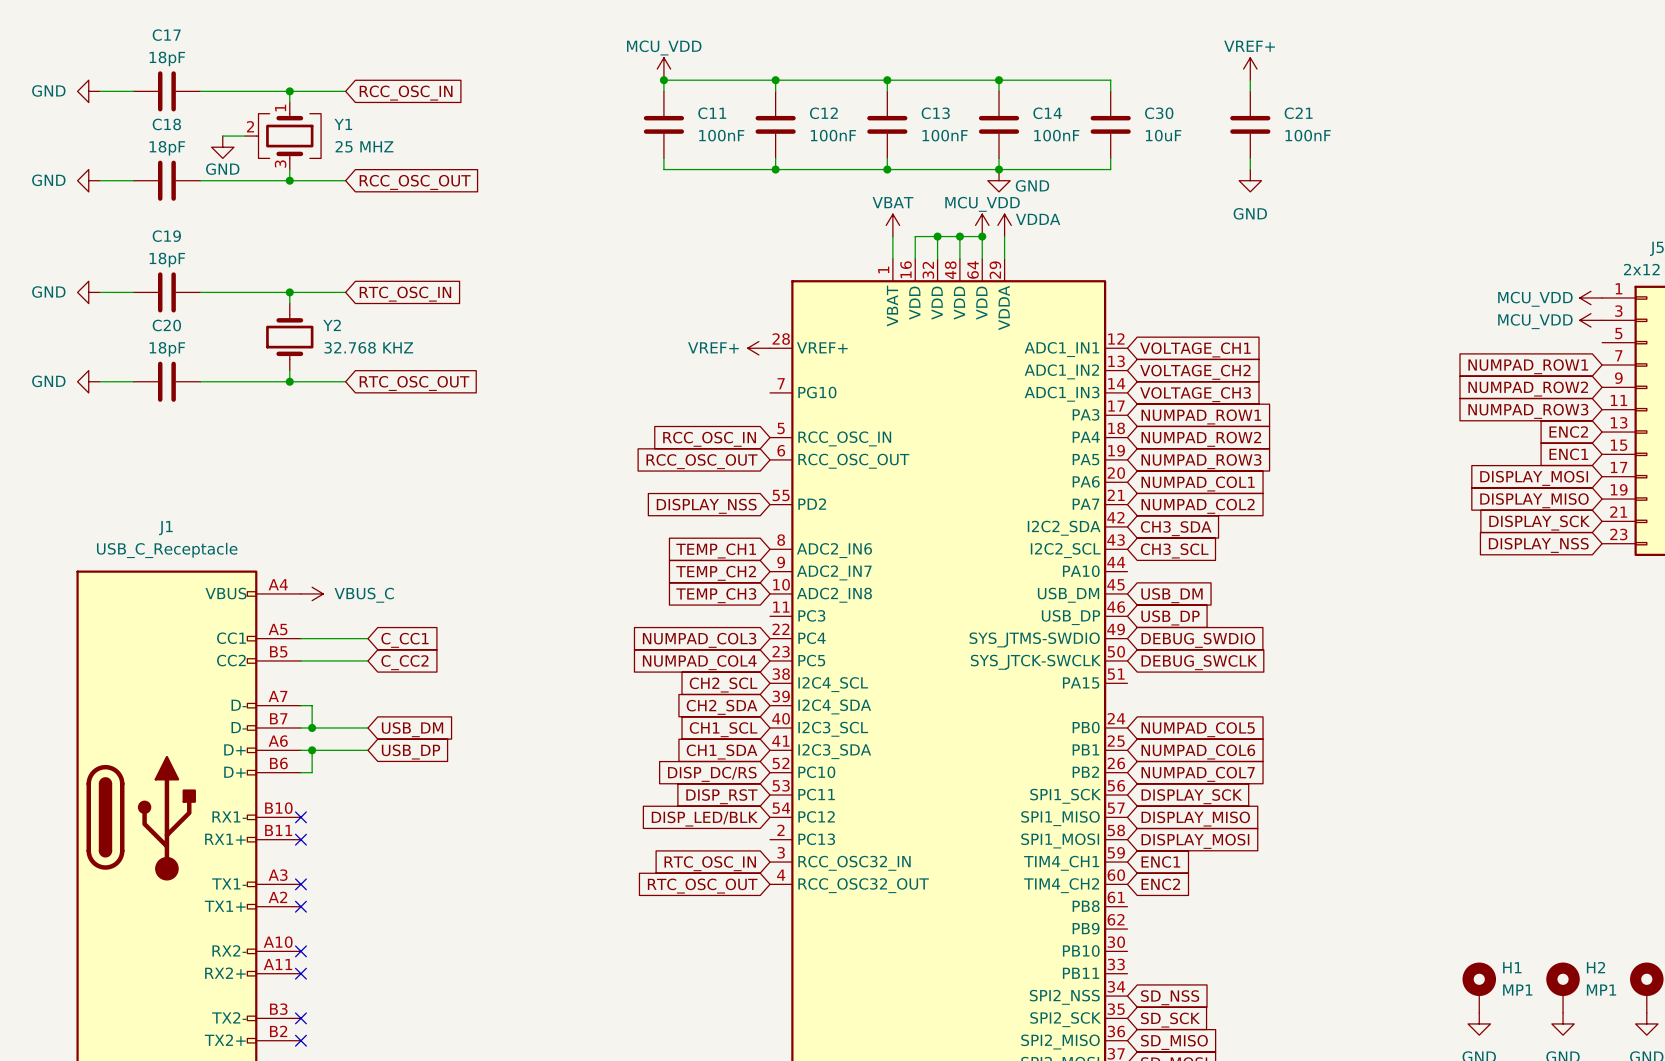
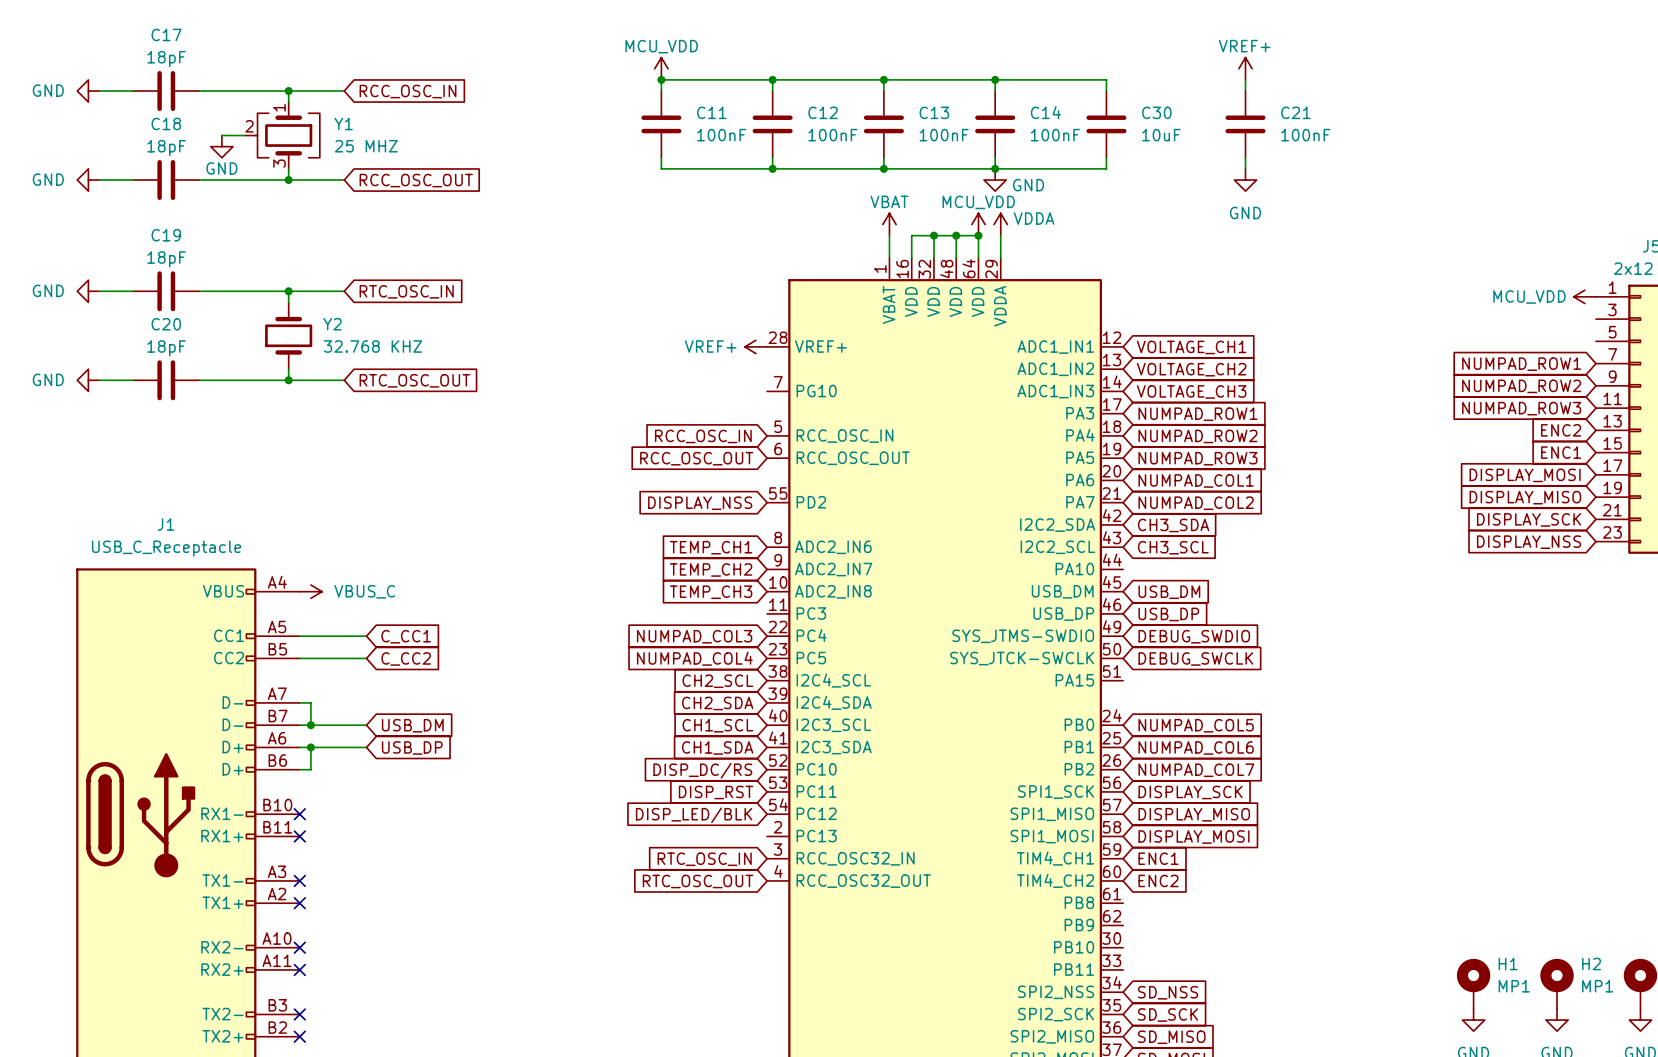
power symbol: MCU_VDD (1590, 320) -> none

